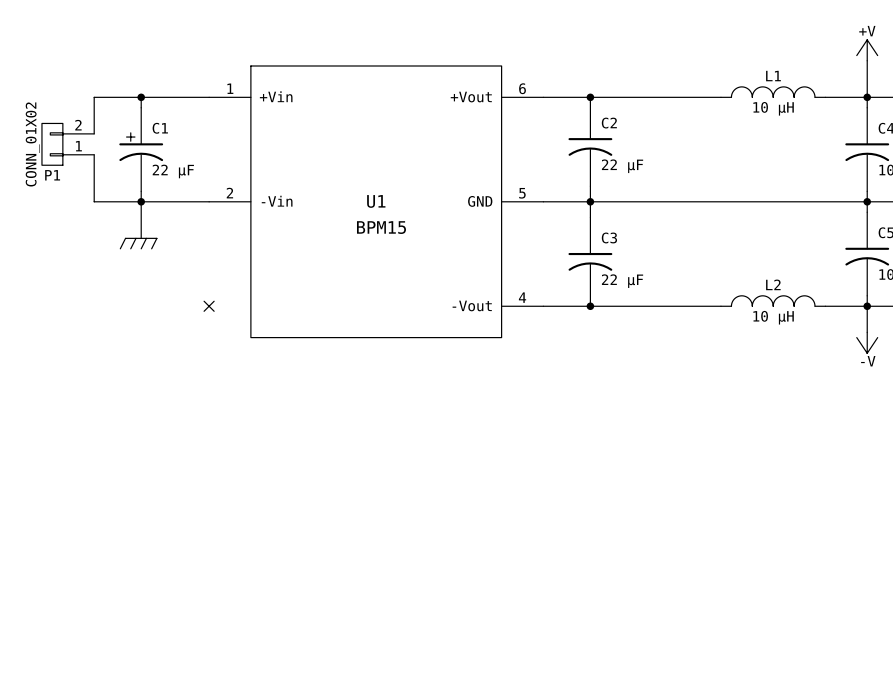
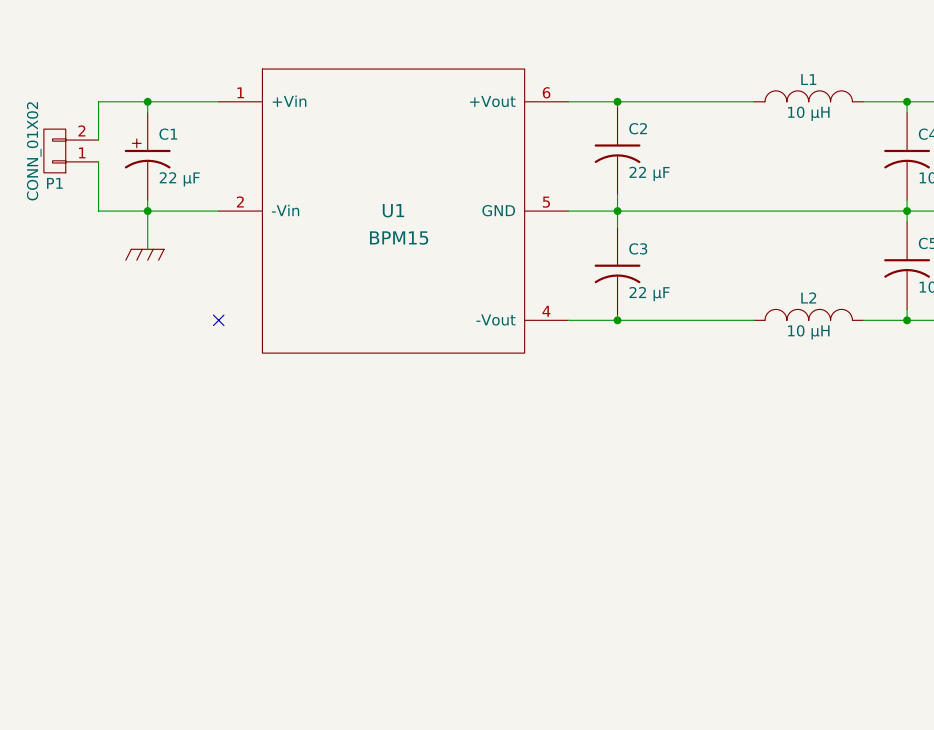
power symbol: +V (867, 50) -> none
wire: (867, 60) (867, 97) -> none
wire: (867, 306) (867, 332) -> none
power symbol: -V (867, 342) -> none

